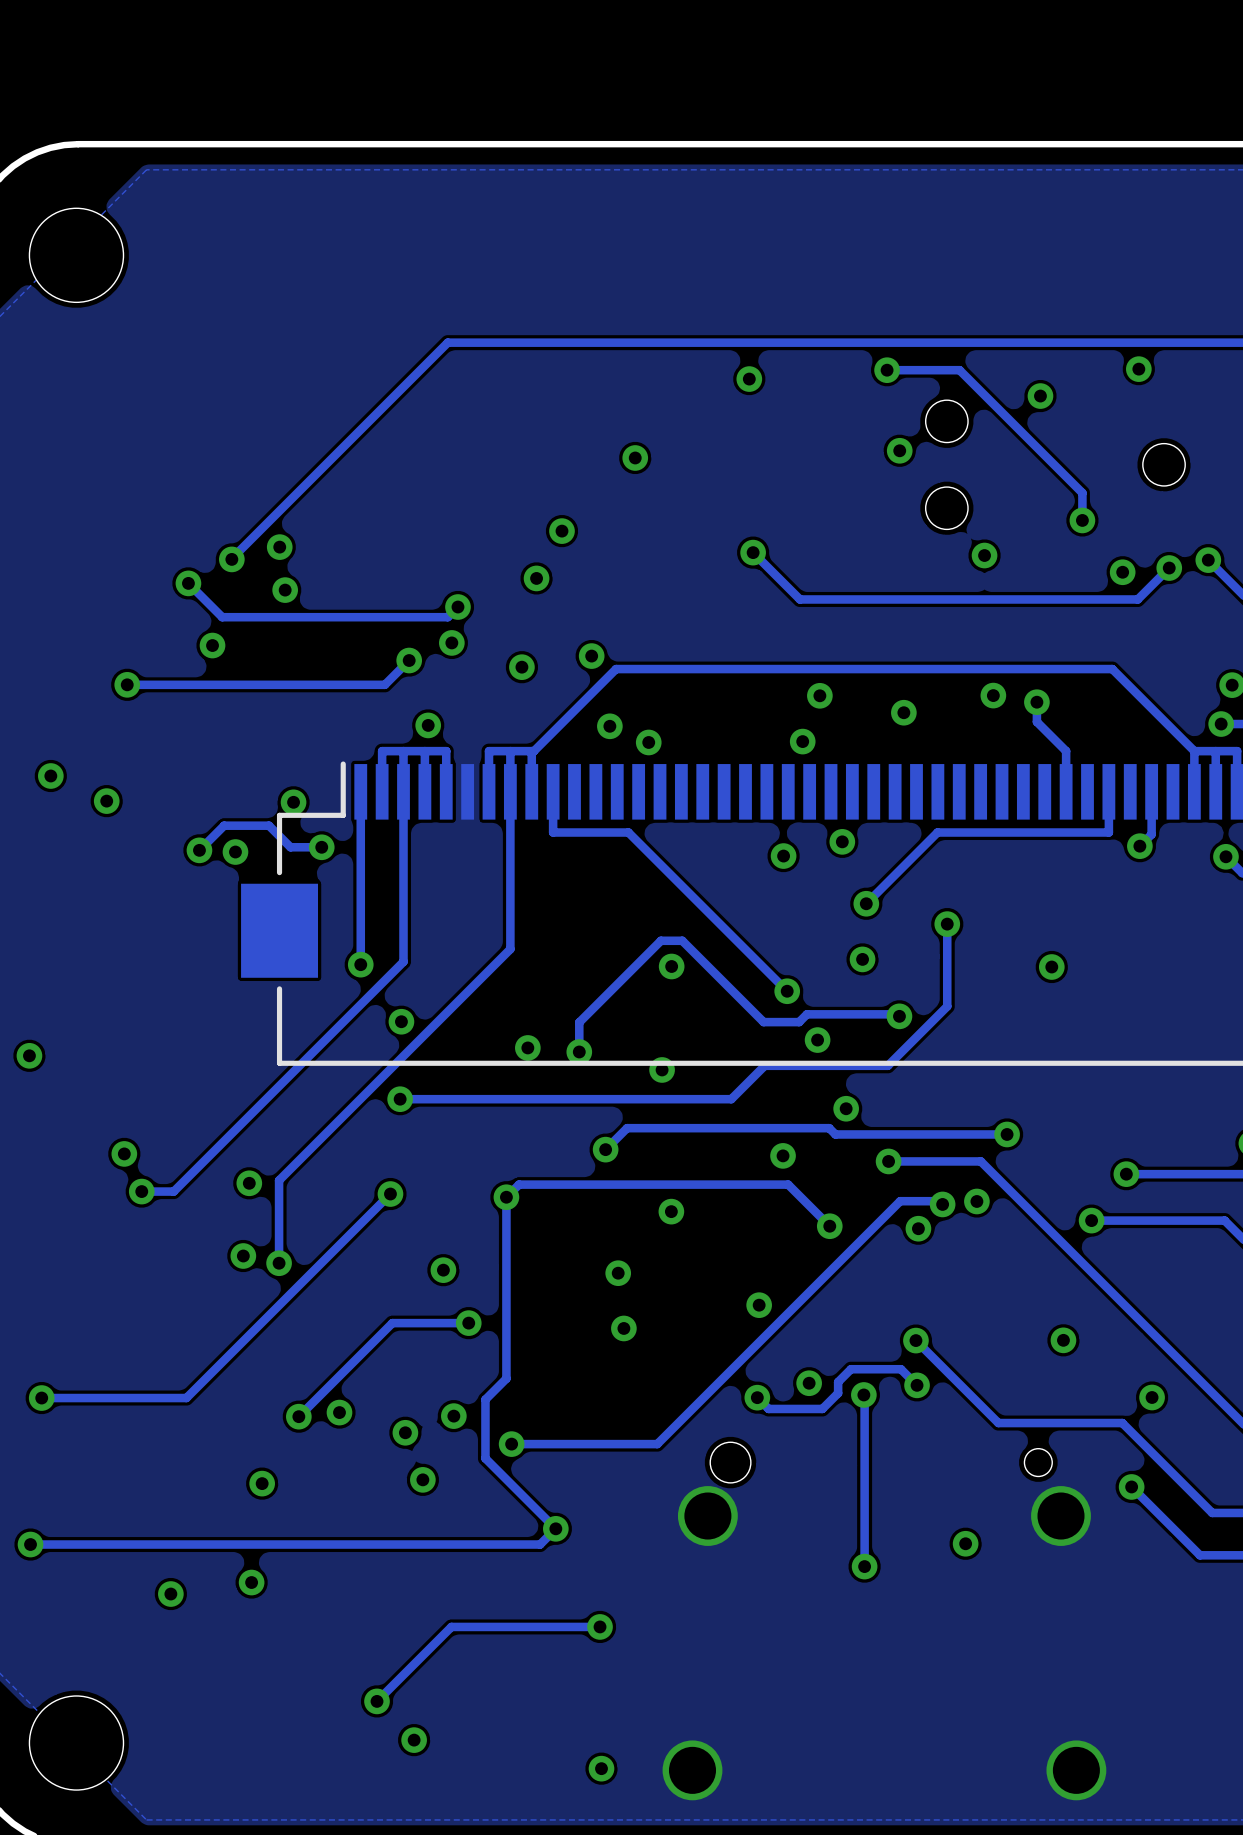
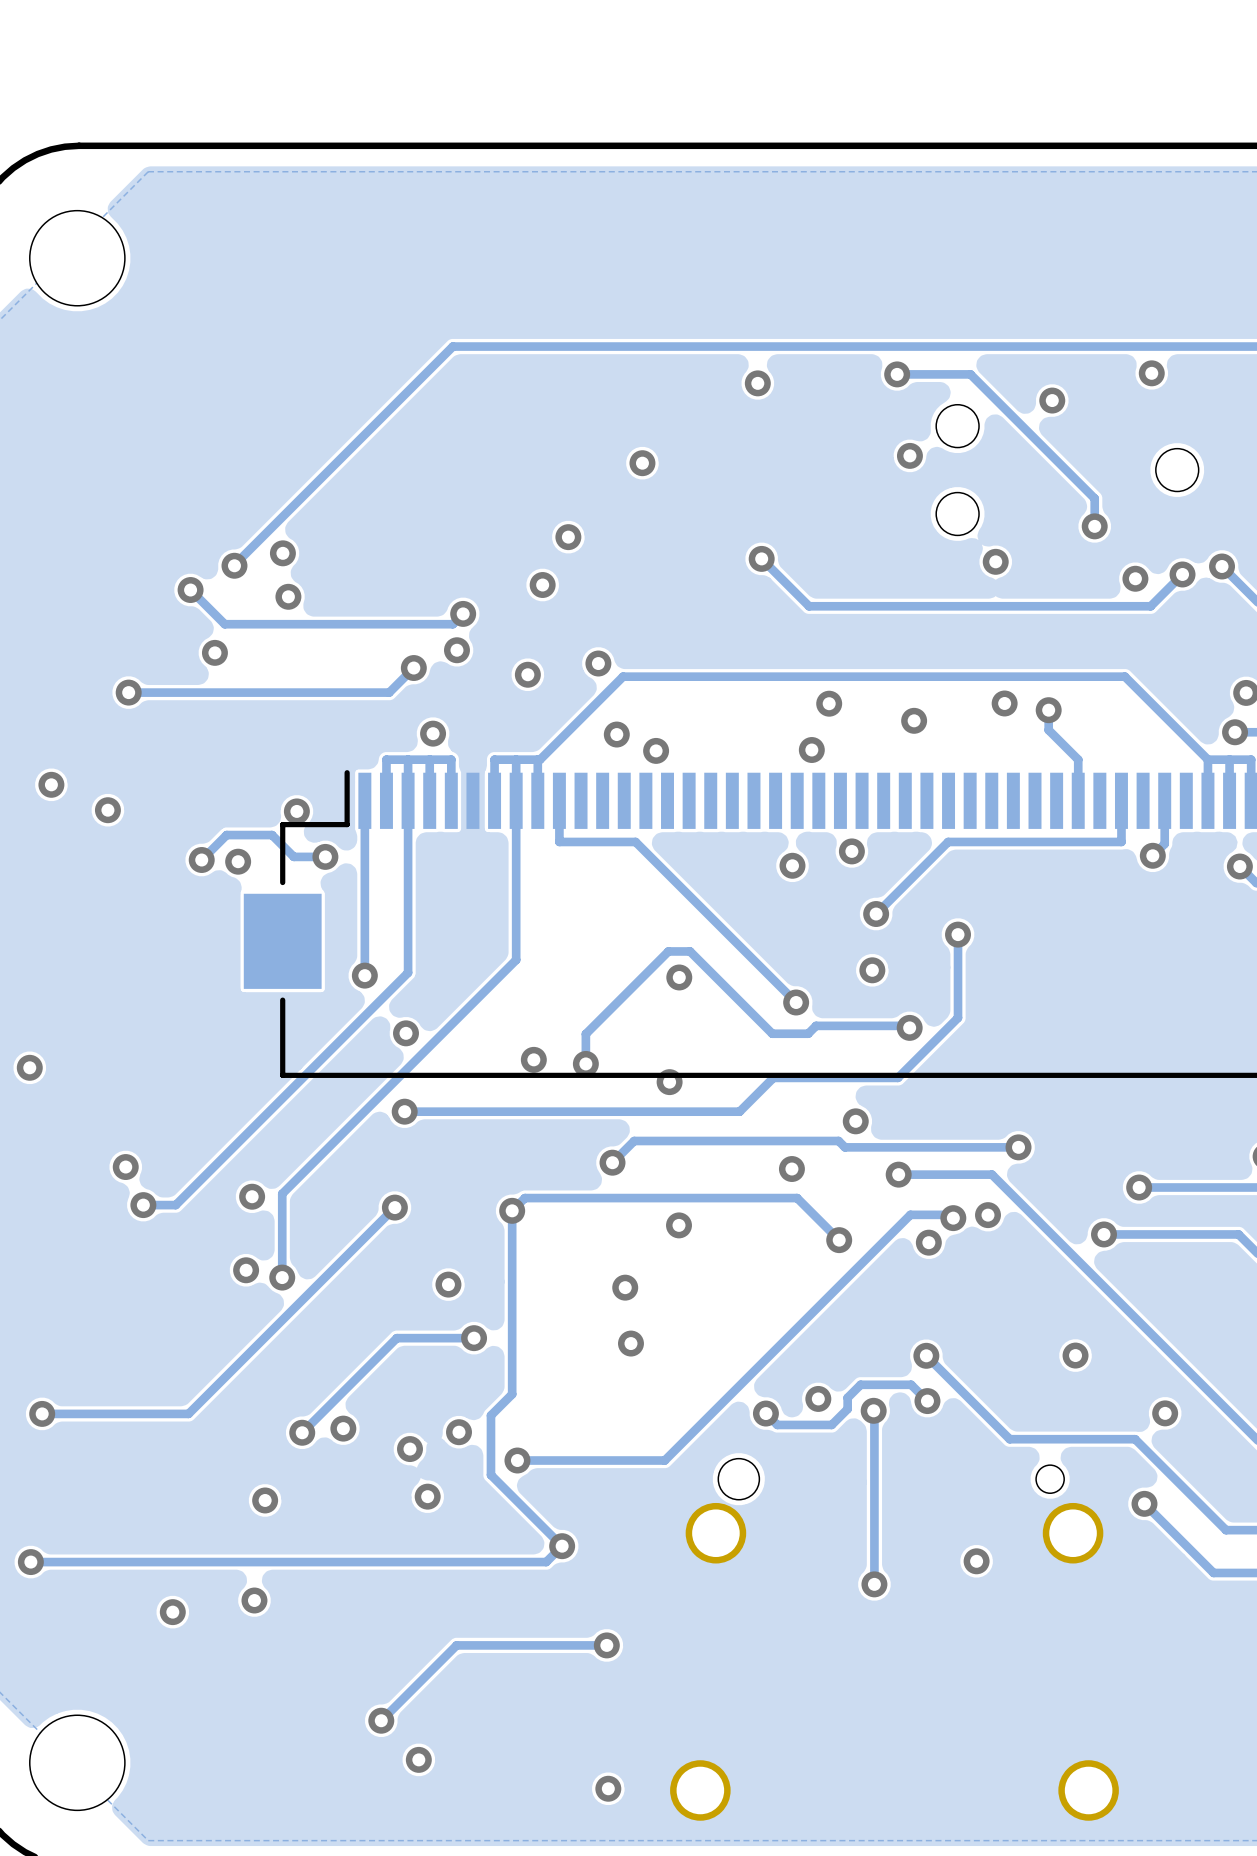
via: (1051, 967) -> none
via: (817, 1040) -> none
via: (759, 1305) -> none

